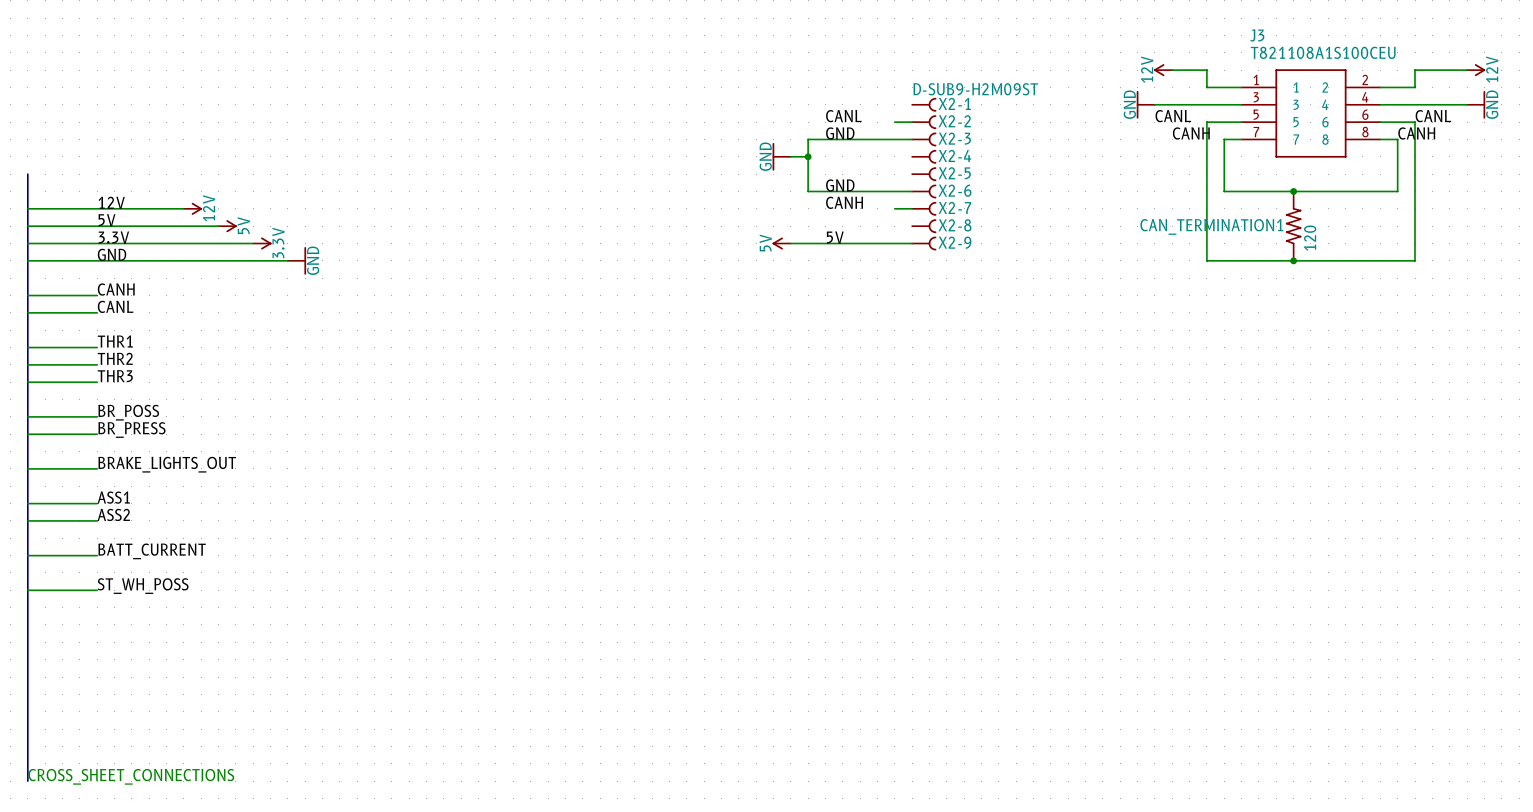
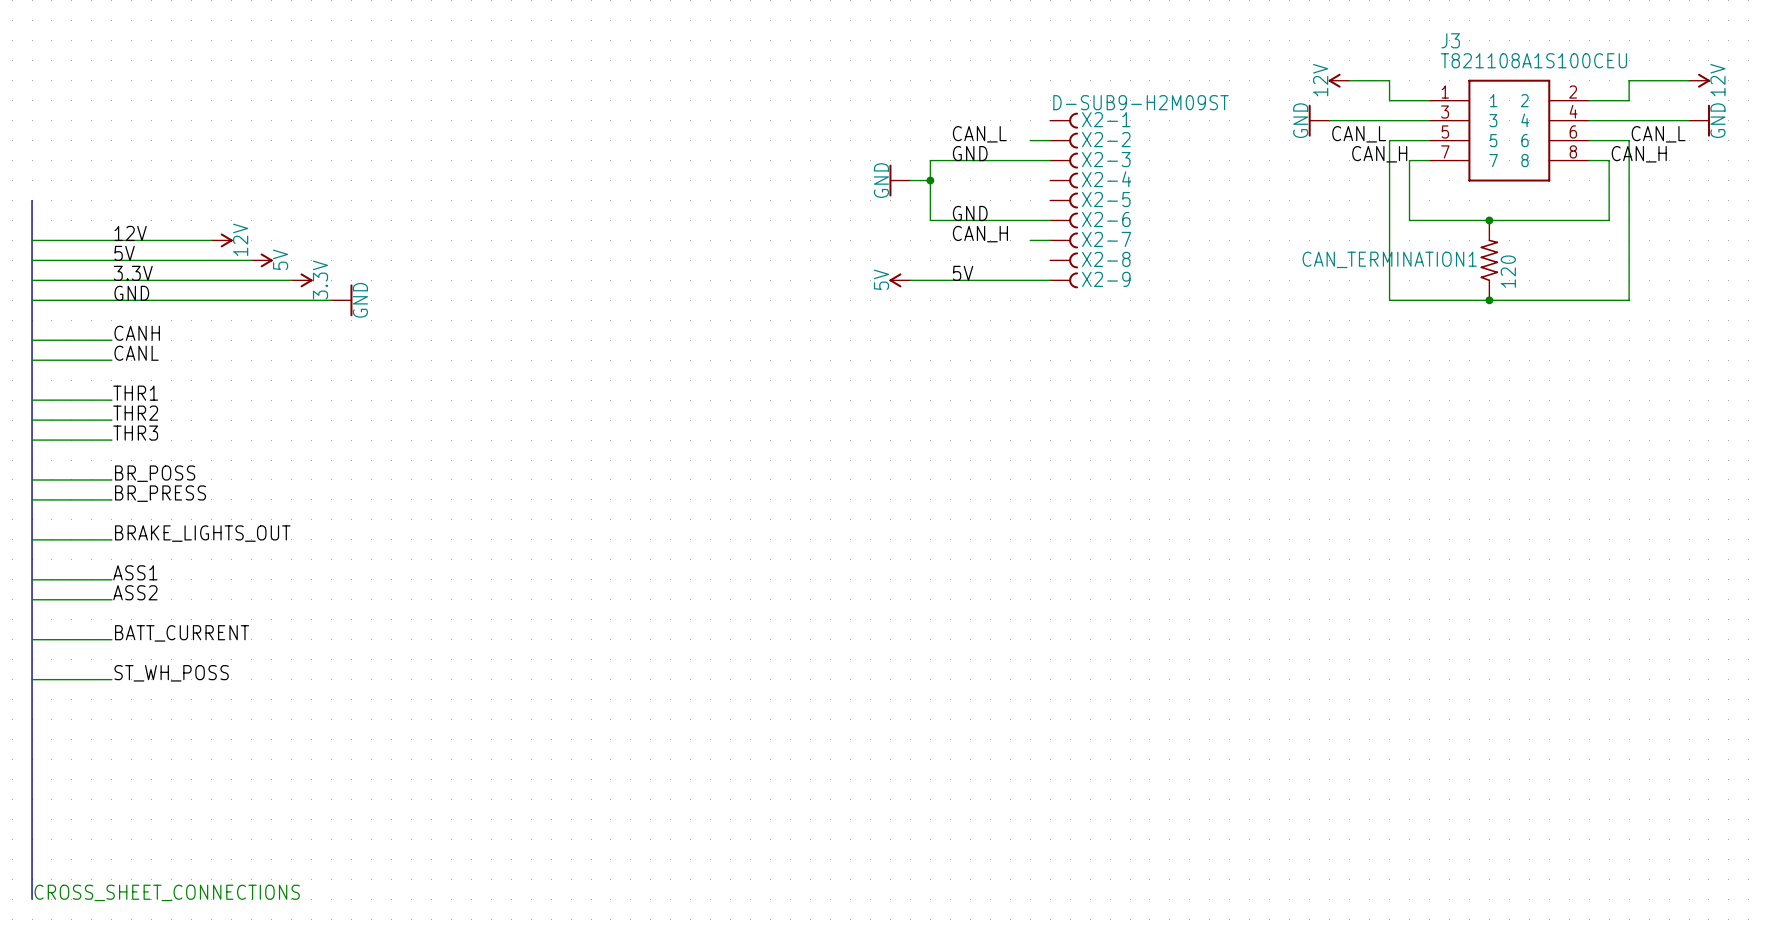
label: CANL (843, 116) -> CAN_L (979, 134)
label: CANL (1173, 116) -> CAN_L (1359, 134)
label: CANL (1433, 116) -> CAN_L (1658, 134)
label: CANH (1191, 133) -> CAN_H (1379, 154)
label: CANH (1416, 133) -> CAN_H (1639, 154)
label: CANH (844, 202) -> CAN_H (980, 234)

